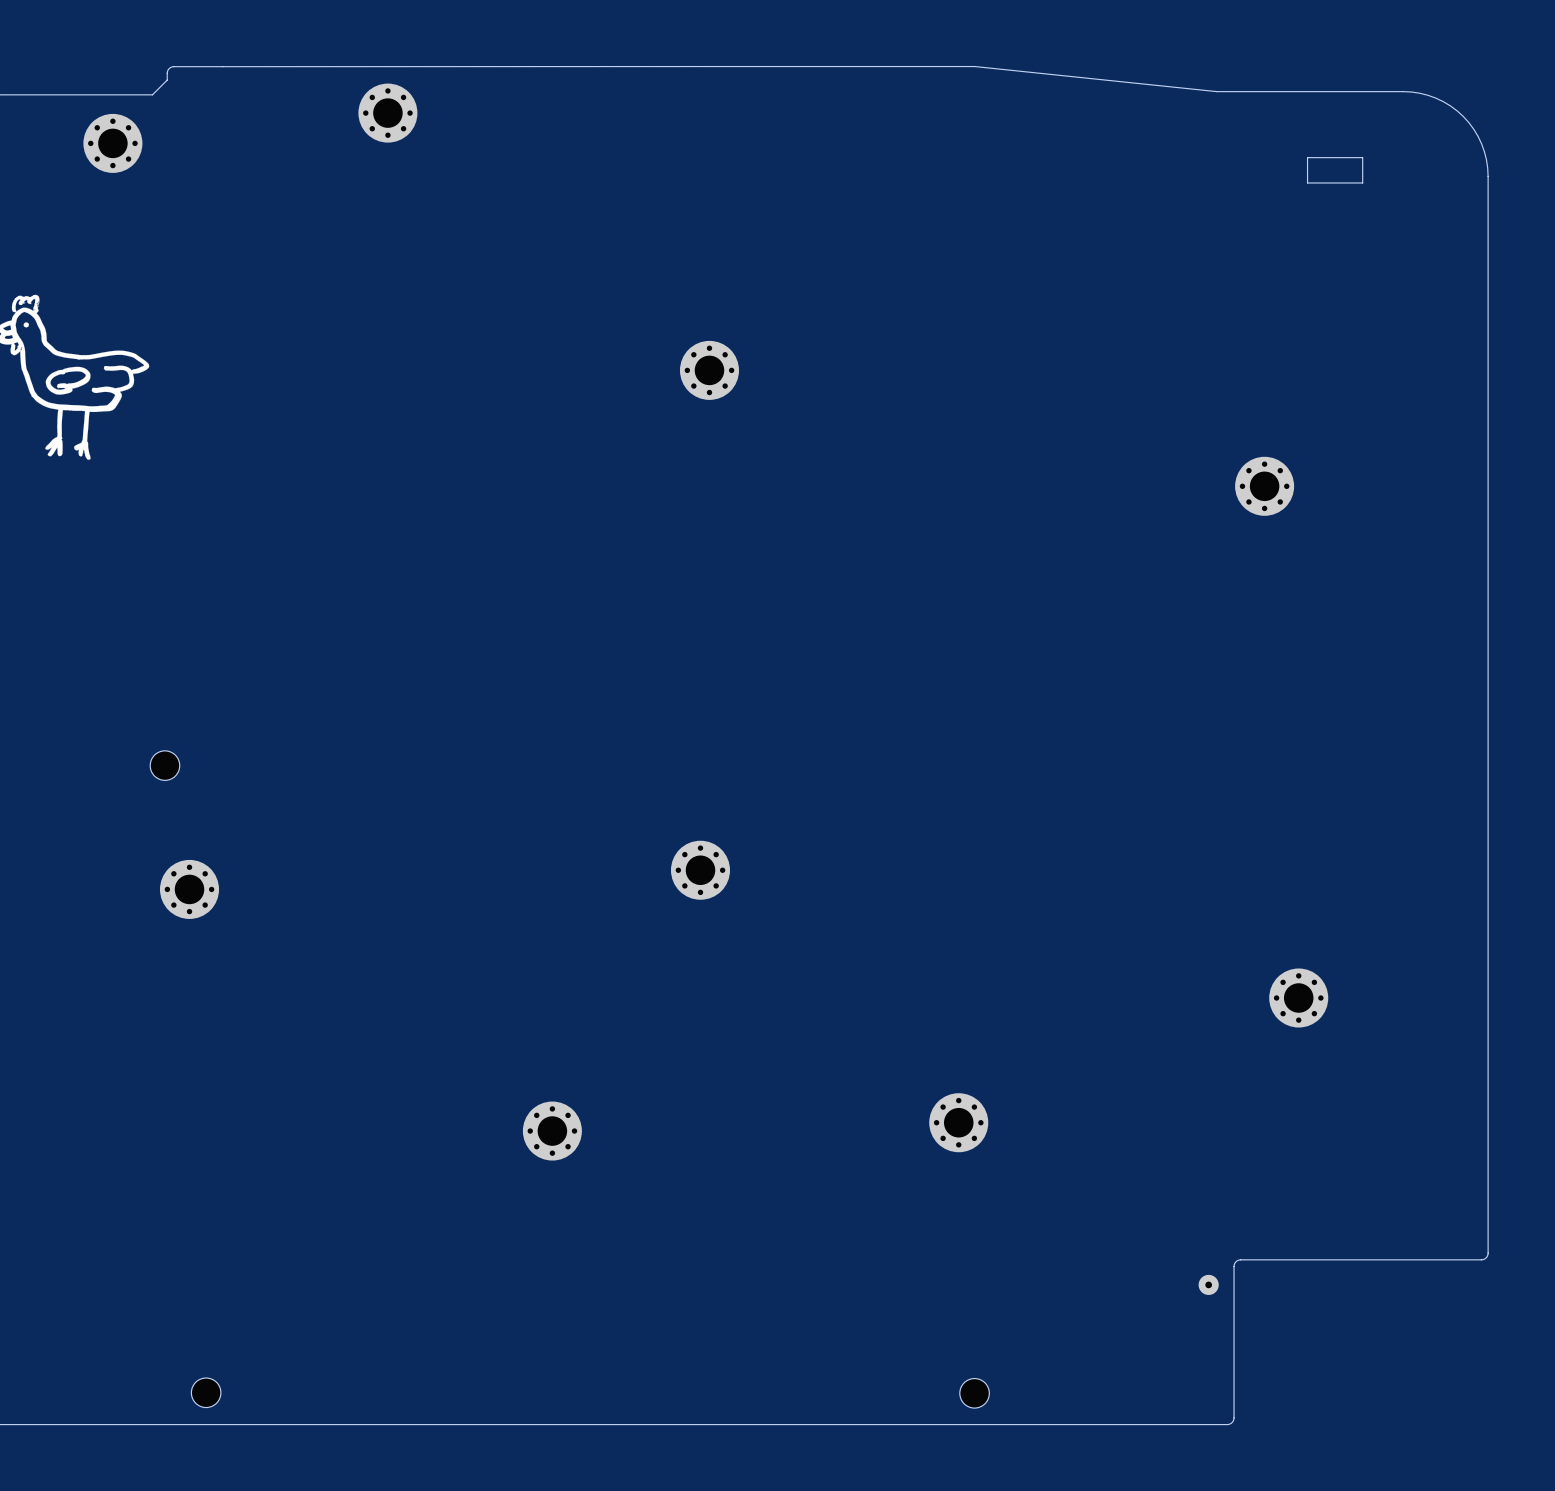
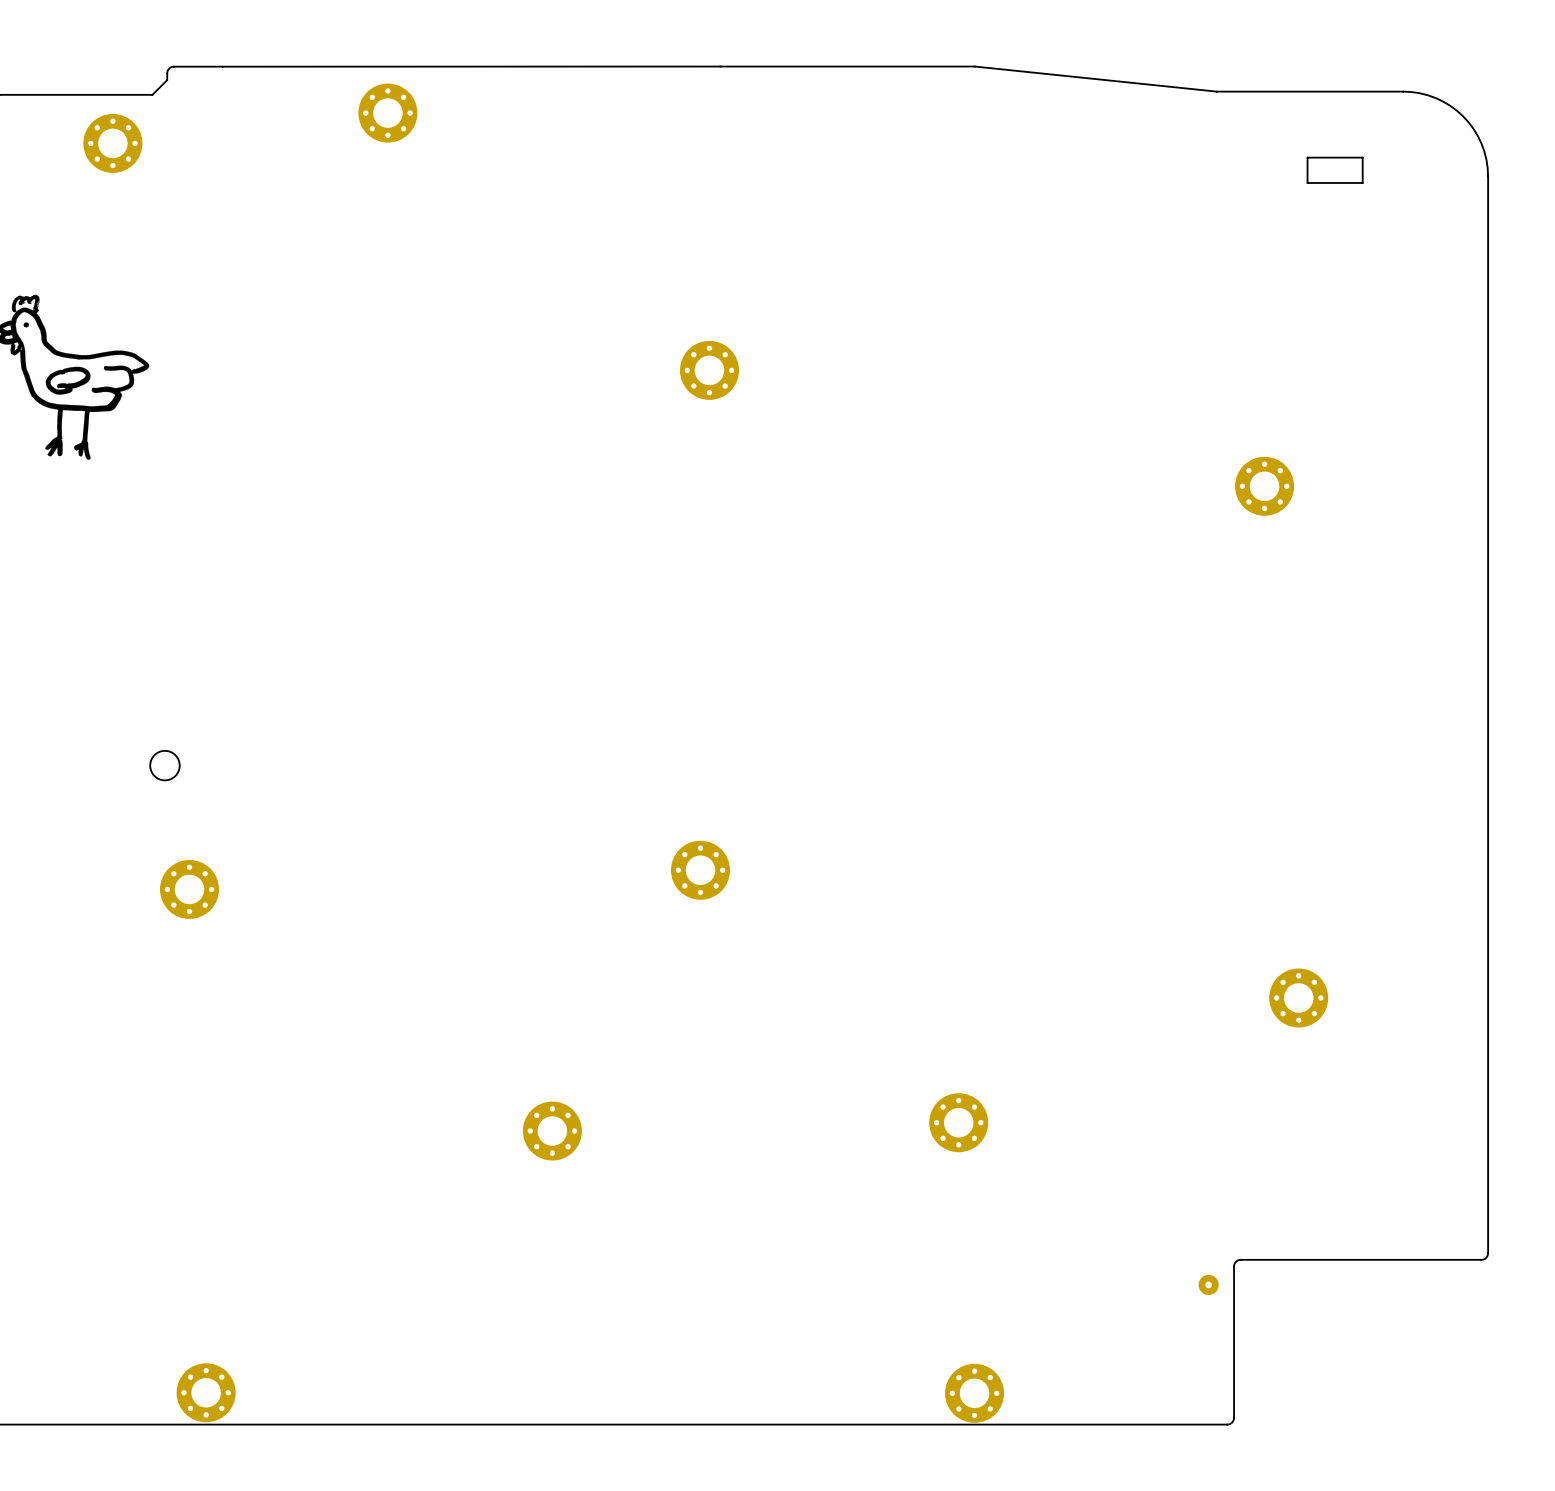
part footprint: [191, 1378, 221, 1408] -> [176, 1363, 236, 1423]
part footprint: [959, 1378, 990, 1409] -> [945, 1363, 1005, 1423]

